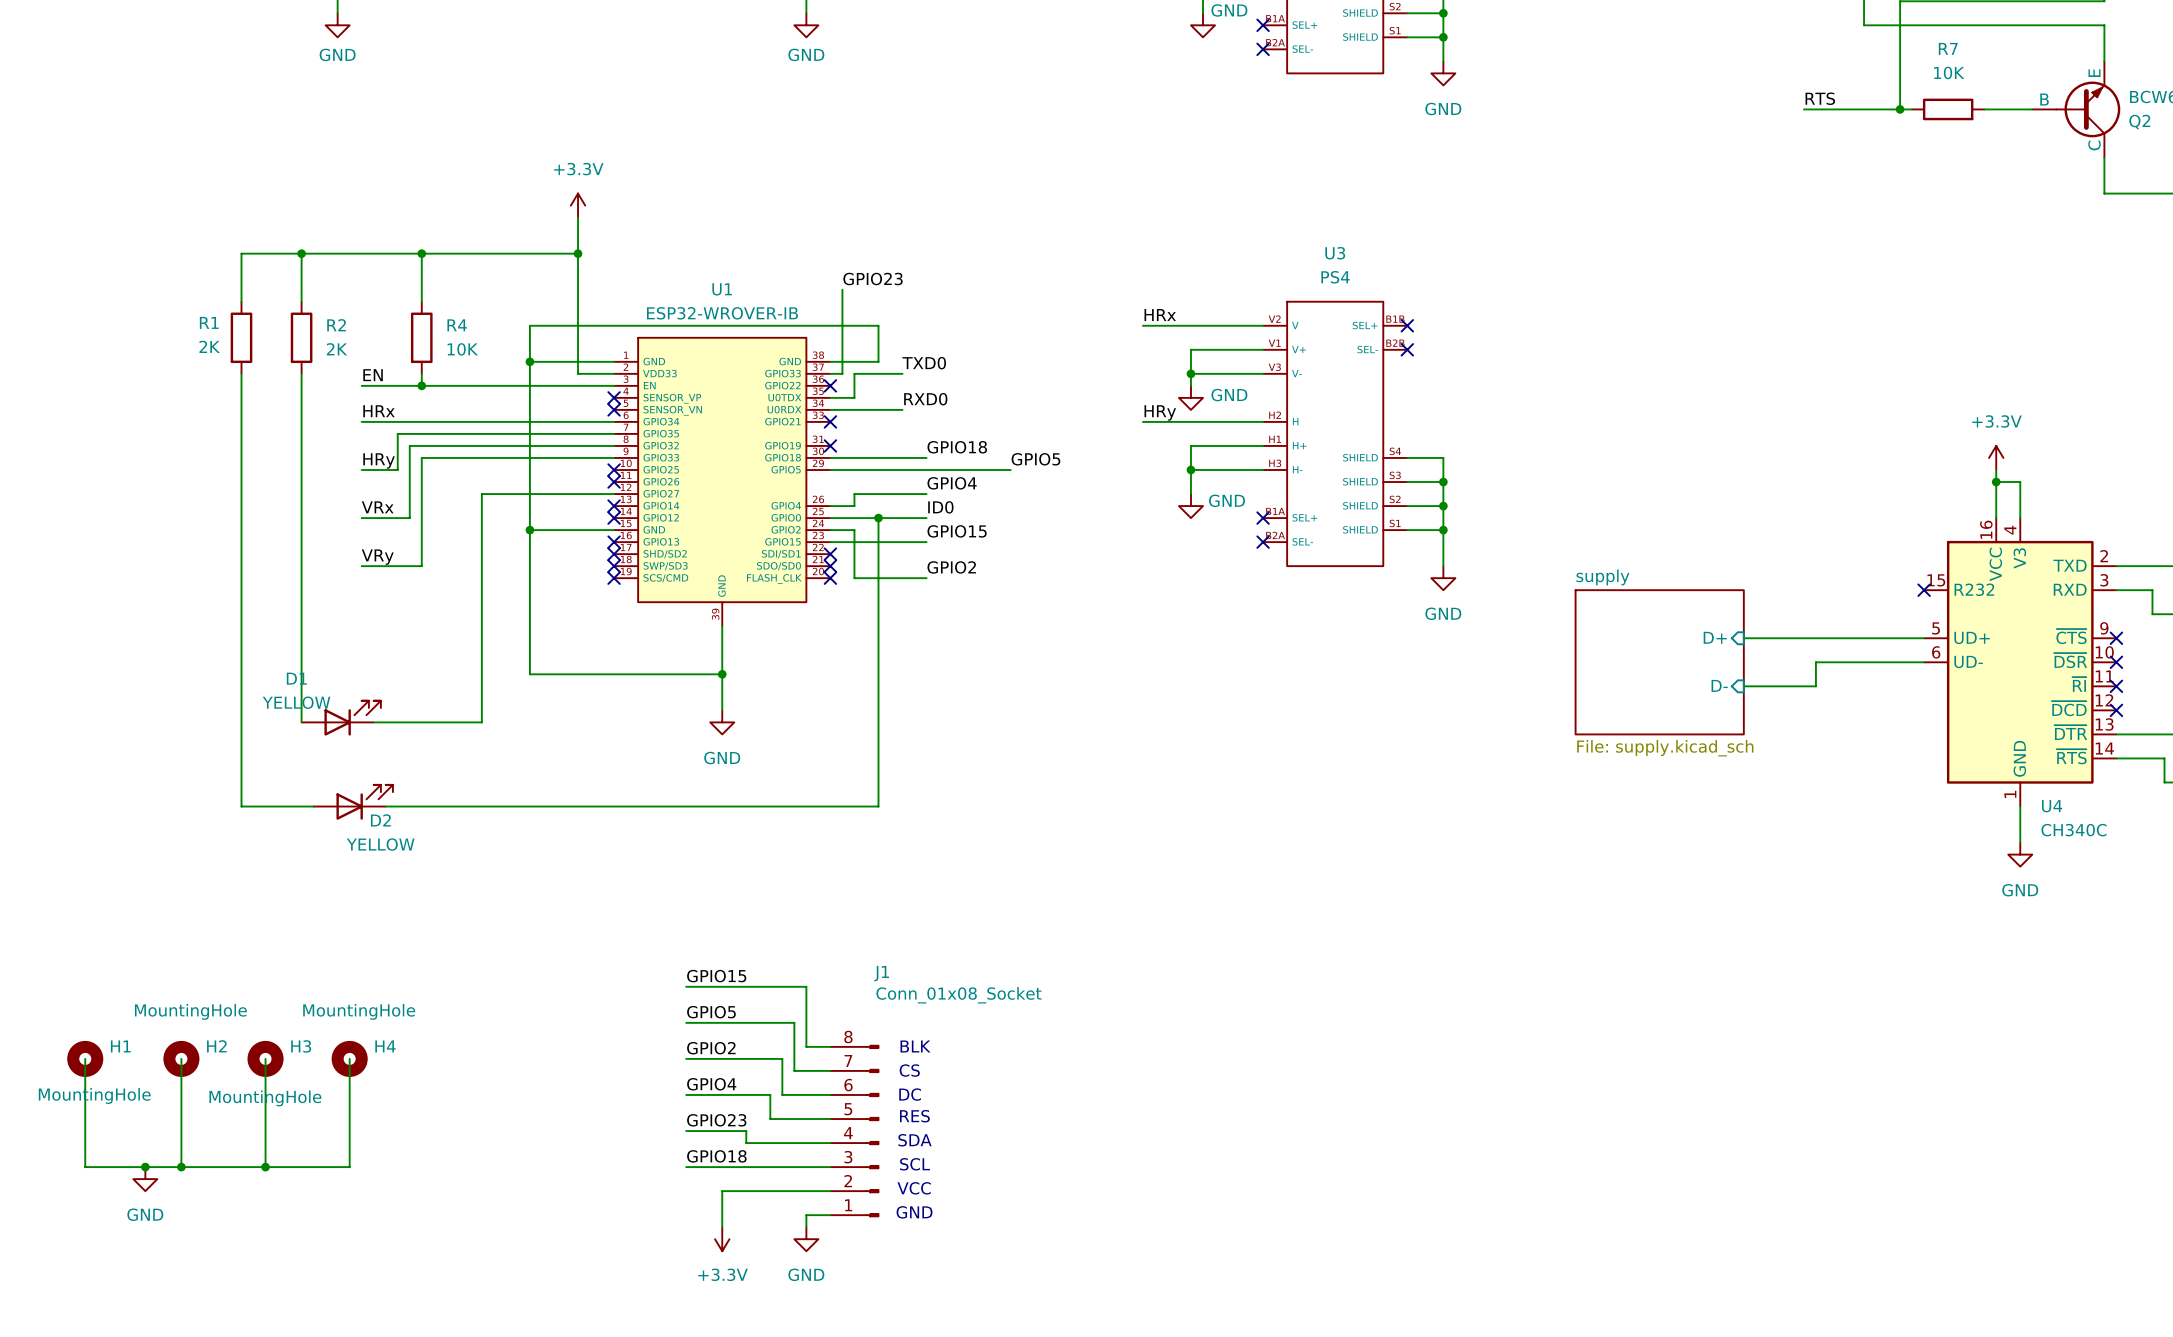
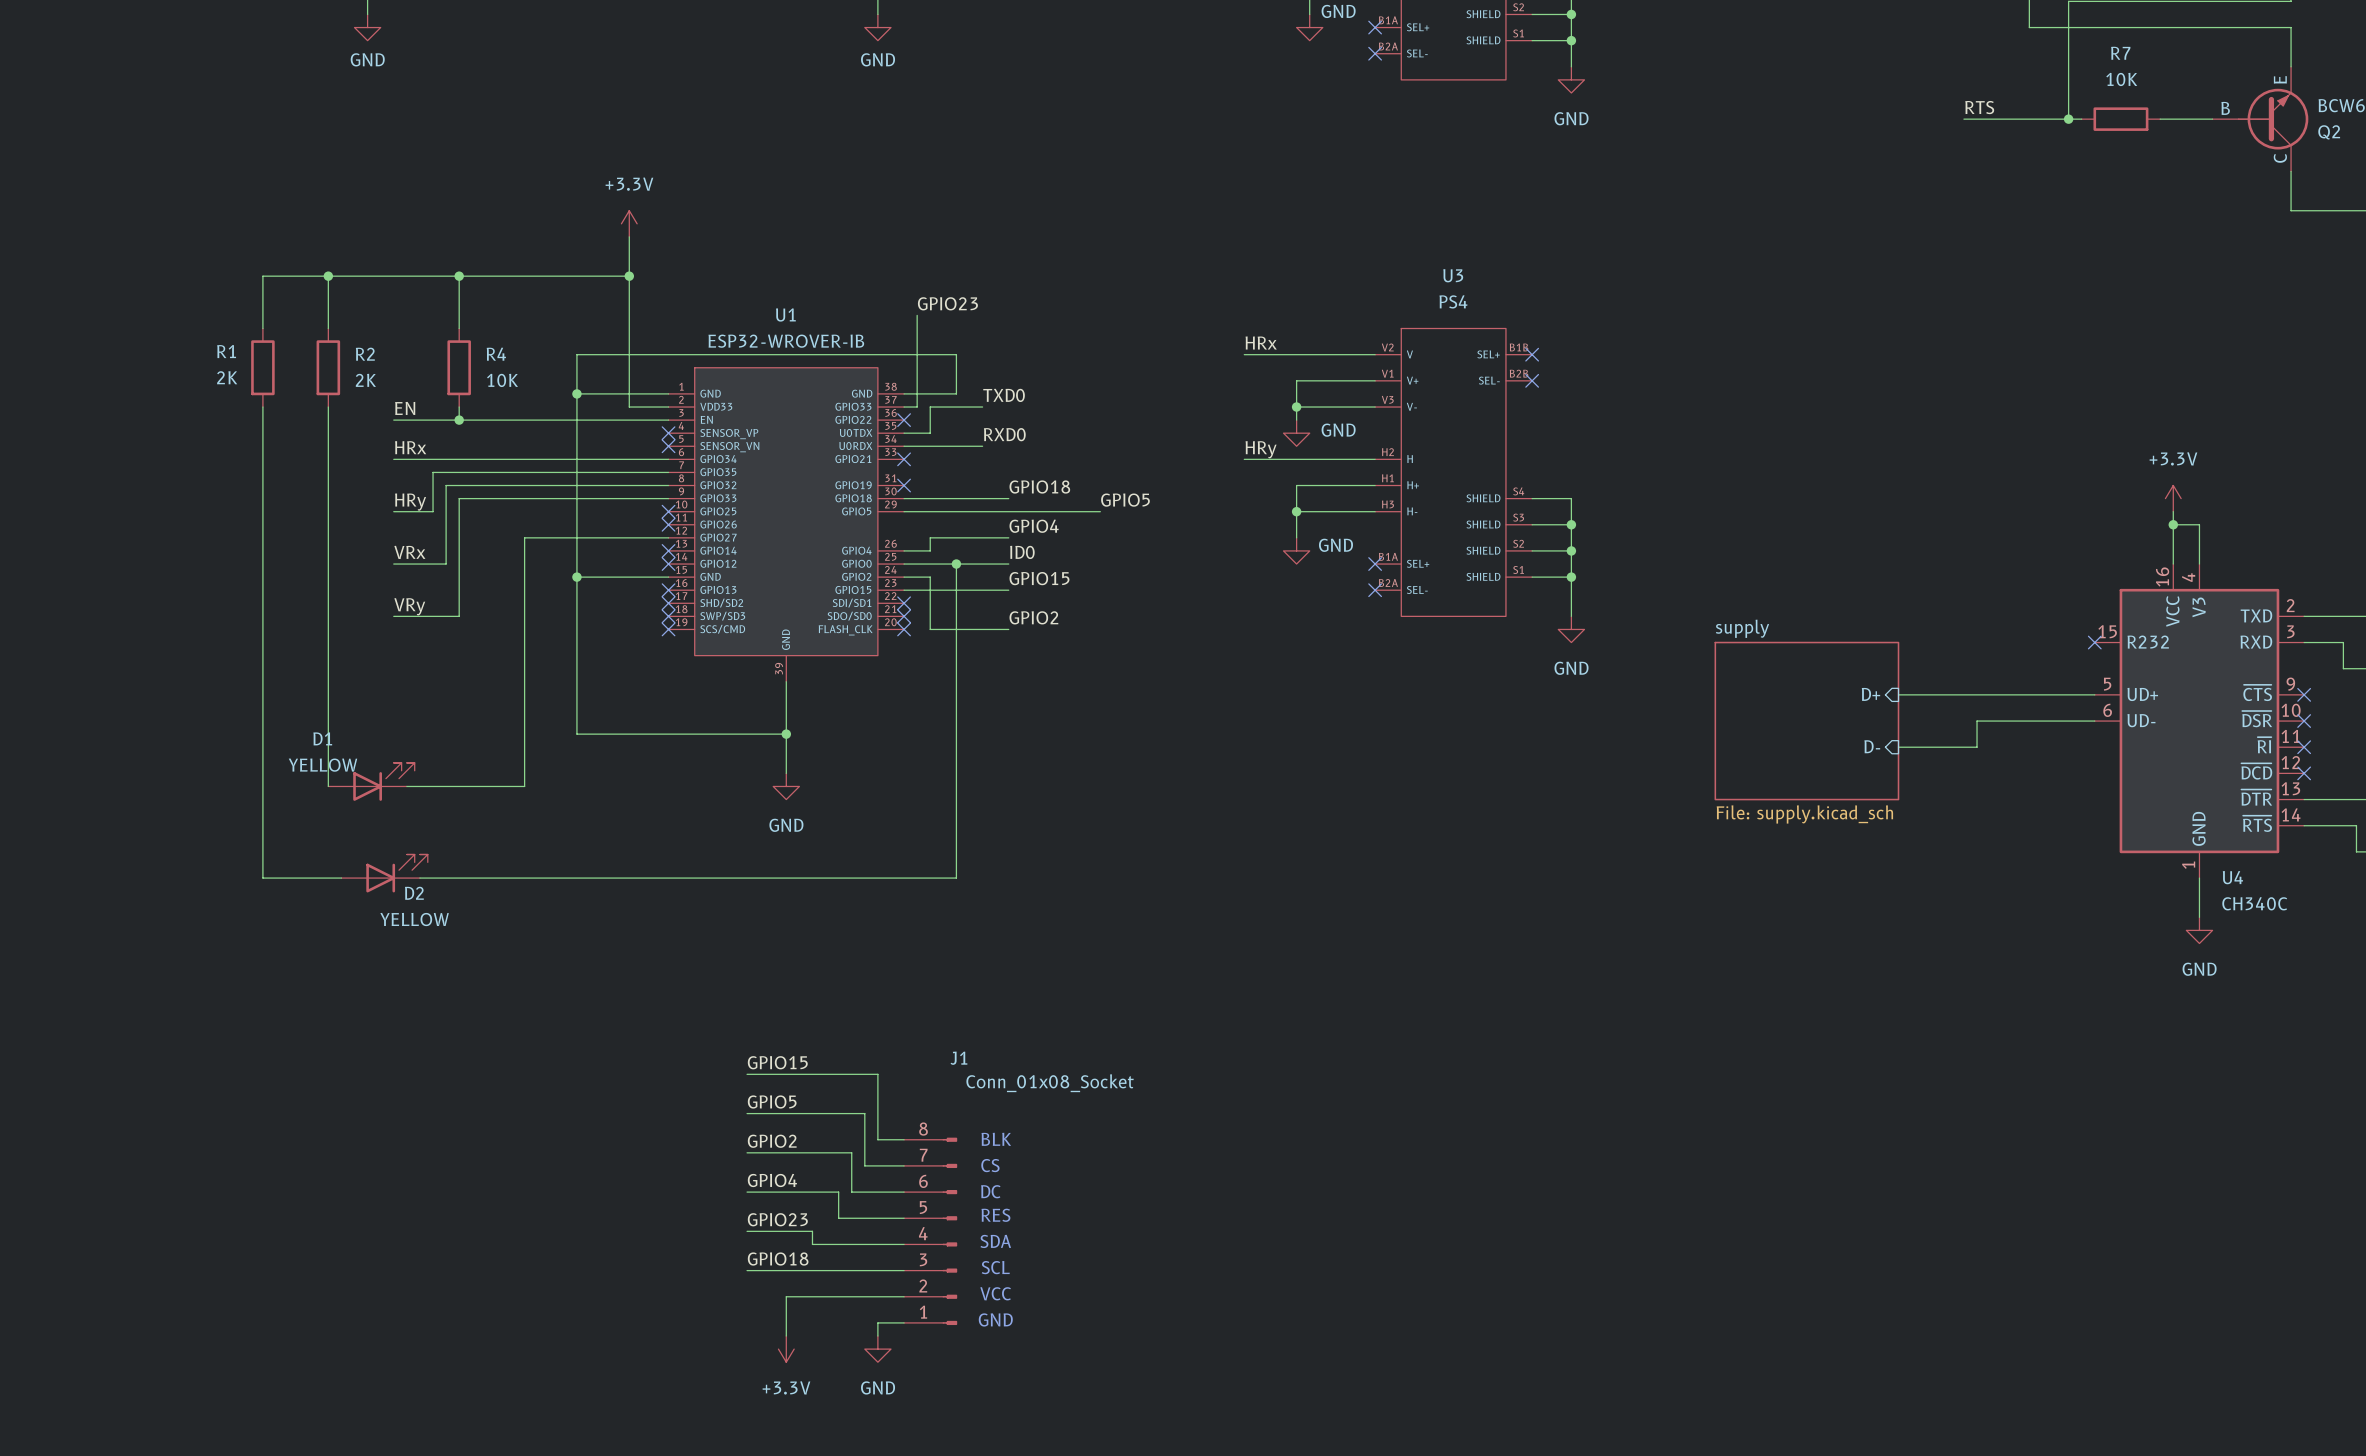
wire: (85, 1058) (85, 1167) (349, 1167) (349, 1058) -> none
H1: MountingHole (85, 1058) -> none
wire: (181, 1058) (181, 1167) -> none
H2: MountingHole (181, 1058) -> none
wire: (265, 1058) (265, 1167) -> none
H3: MountingHole (265, 1058) -> none
H4: MountingHole (349, 1058) -> none
junction: (145, 1167) -> none
junction: (181, 1167) -> none
junction: (265, 1167) -> none
power symbol: GND (145, 1179) -> none

